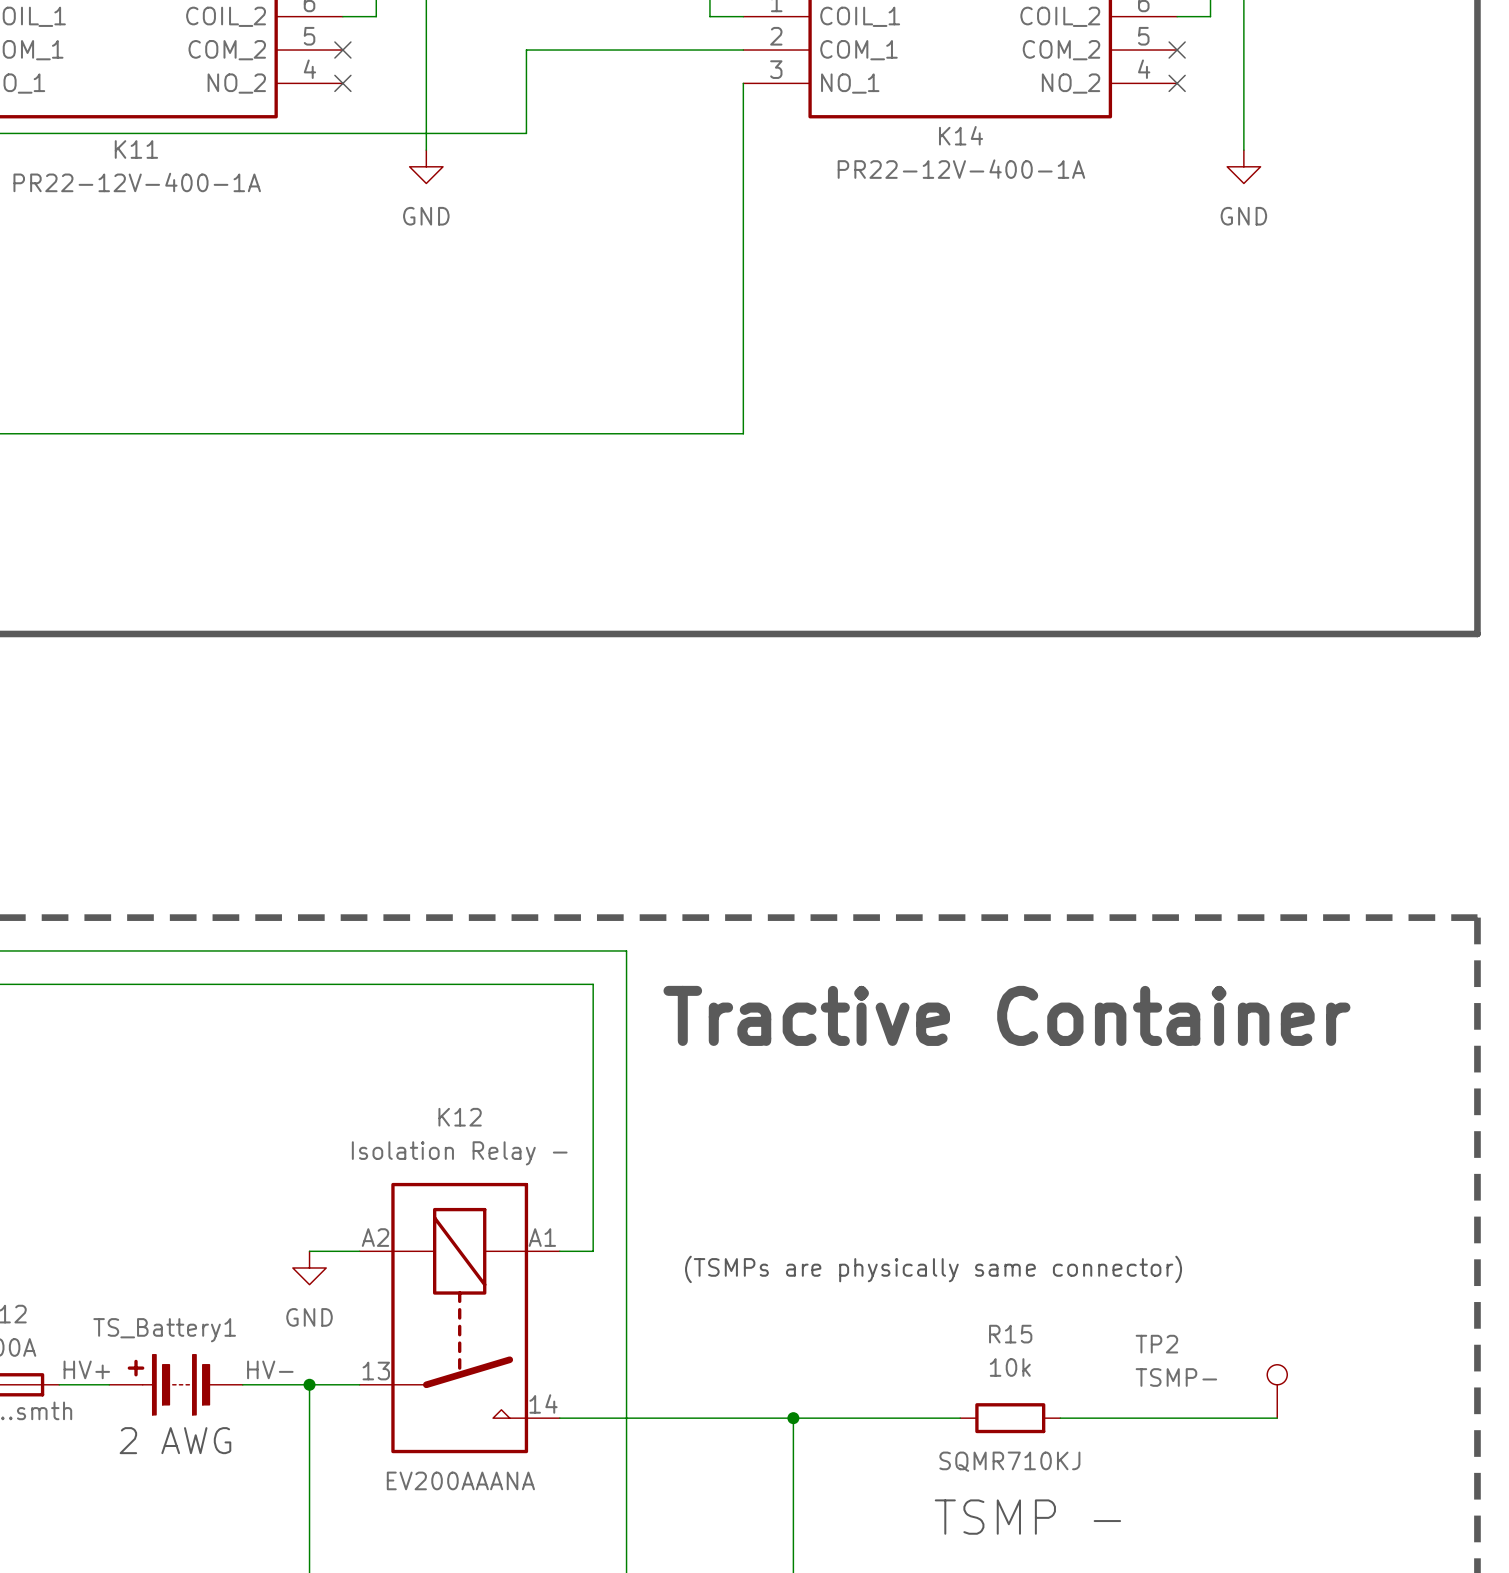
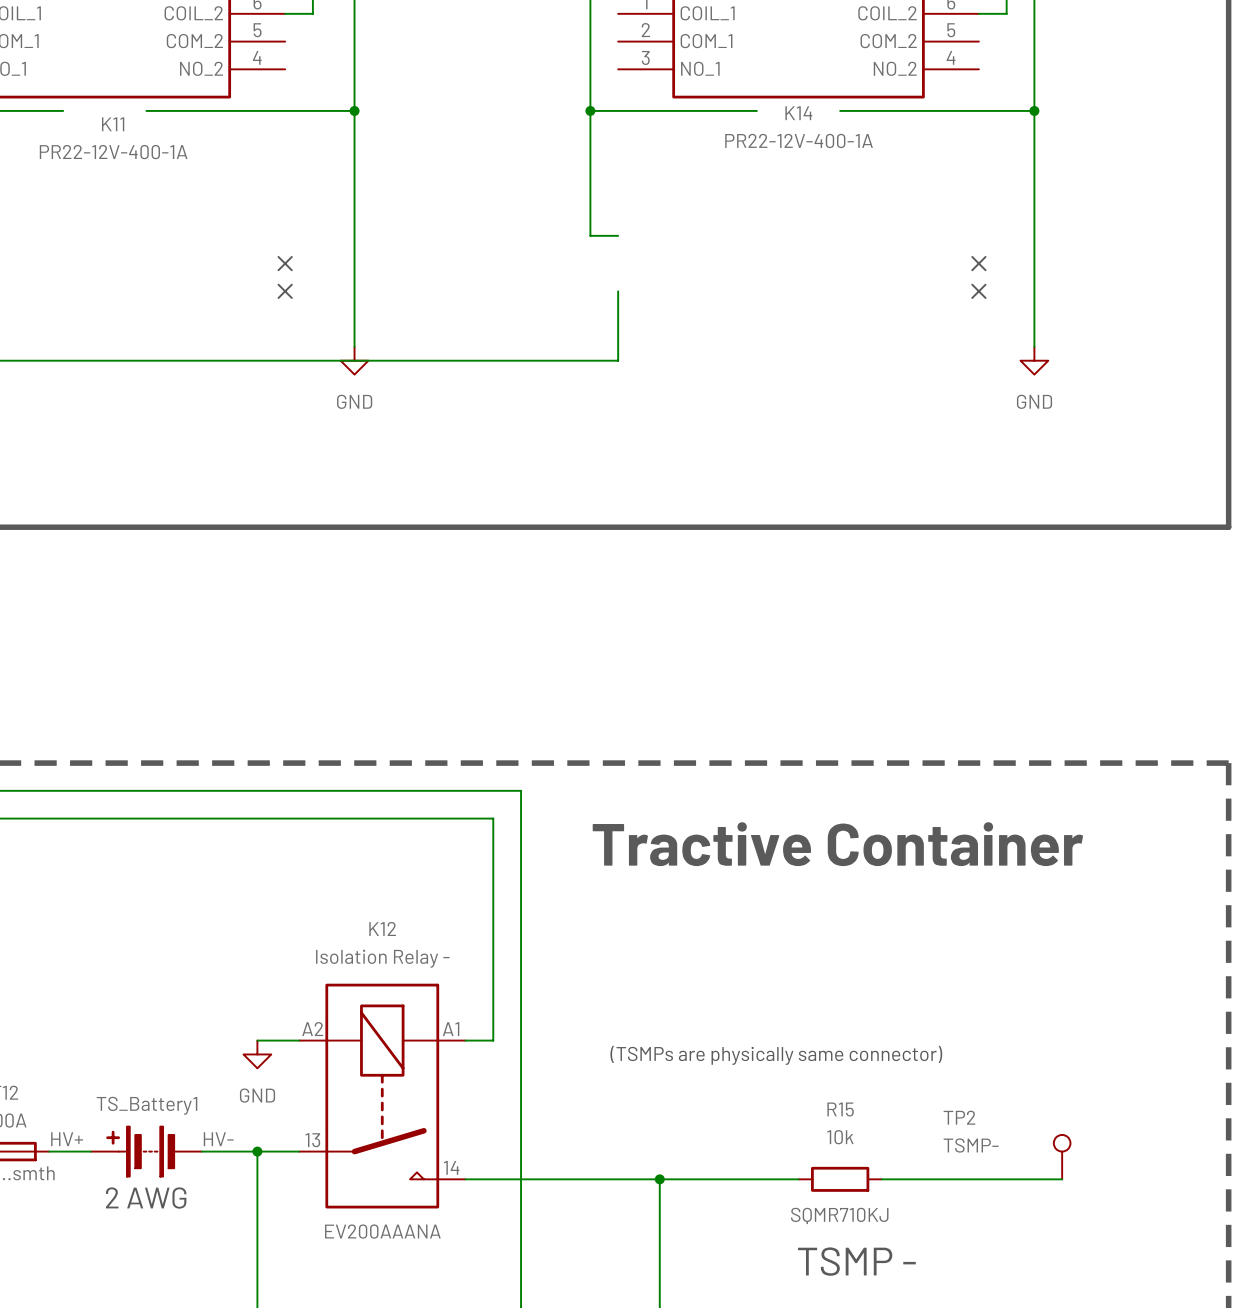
wire: (709, 16) (743, 16) -> (590, 13) (590, 235) (618, 235)
no-connect mark: (342, 50) -> none
wire: (743, 50) (526, 50) (526, 133) (426, 133) -> none
no-connect mark: (1177, 50) -> none
no-connect mark: (342, 83) -> none
wire: (743, 83) (743, 350) -> (354, 124) (354, 346)
no-connect mark: (1177, 83) -> none
wire: (75, 133) (176, 133) -> none
junction: none -> (354, 110)
wire: none -> (590, 110) (756, 110)
junction: none -> (590, 110)
wire: none -> (840, 110) (1034, 110)
junction: none -> (1034, 110)
wire: none -> (1034, 124) (1034, 346)
power symbol position: GND (426, 166) -> GND (354, 360)
power symbol position: GND (1243, 166) -> GND (1034, 360)
no-connect mark: none -> (285, 263)
no-connect mark: none -> (978, 263)
no-connect mark: none -> (285, 291)
no-connect mark: none -> (978, 291)

